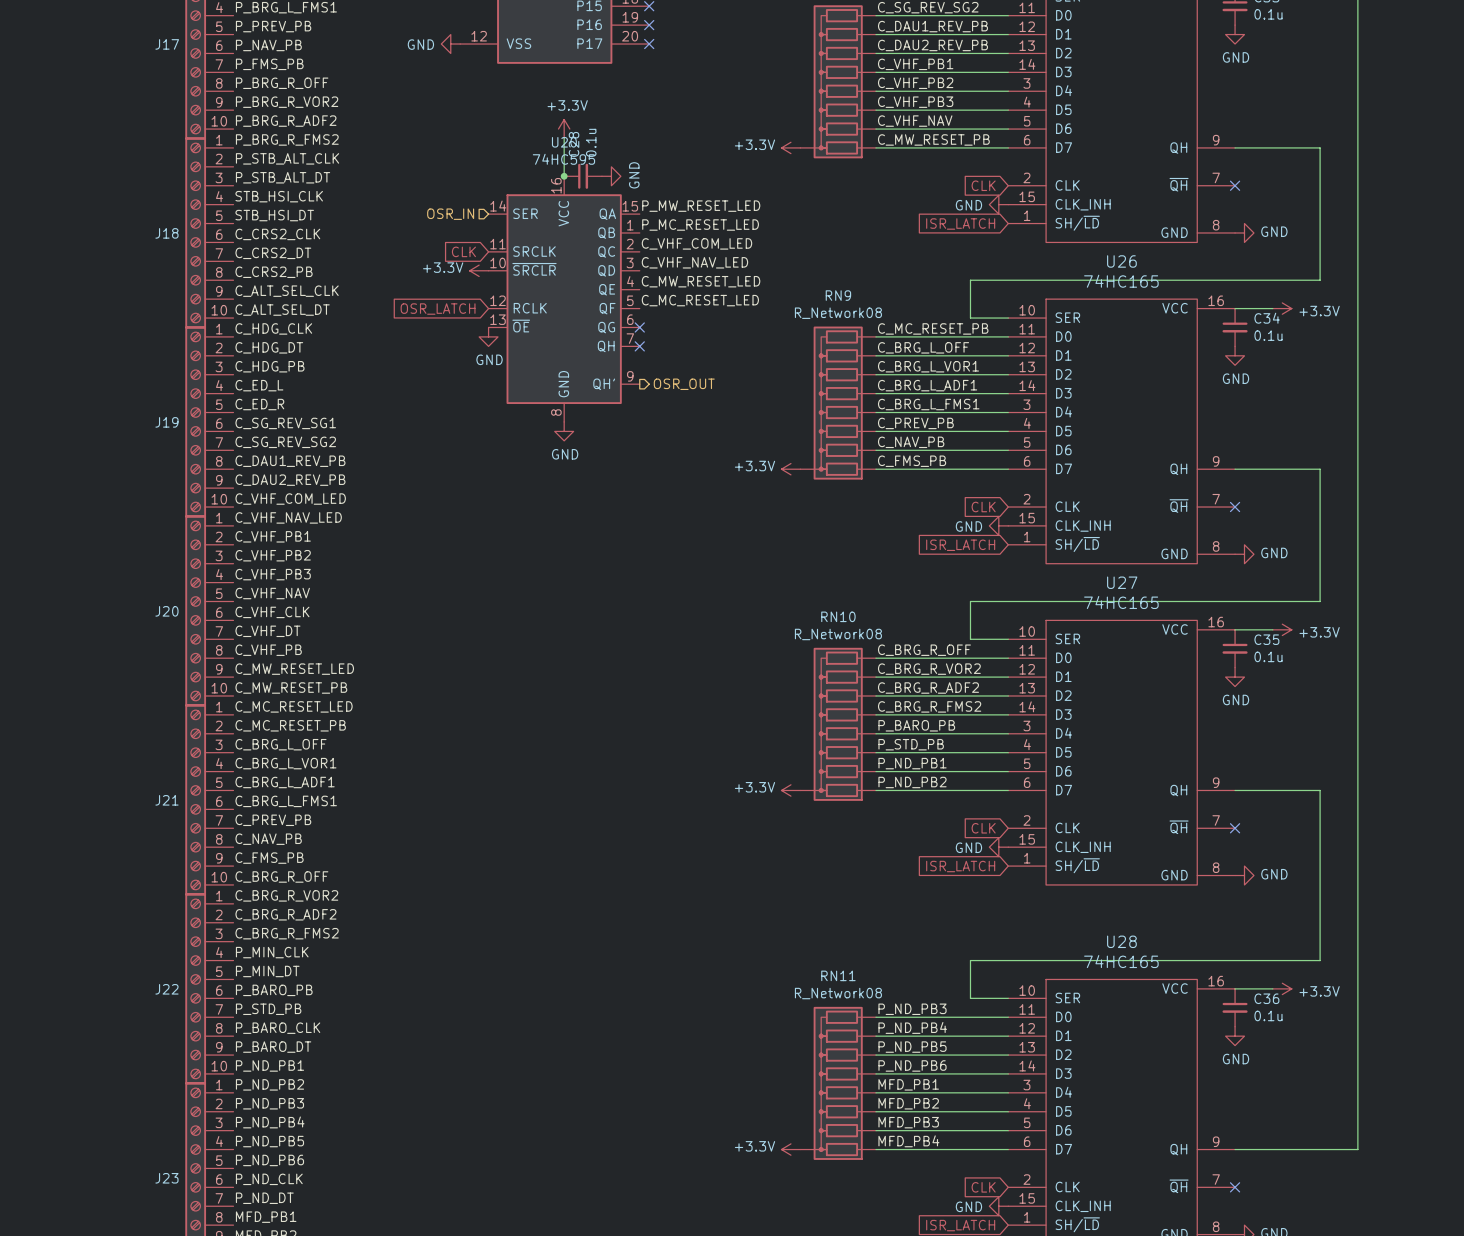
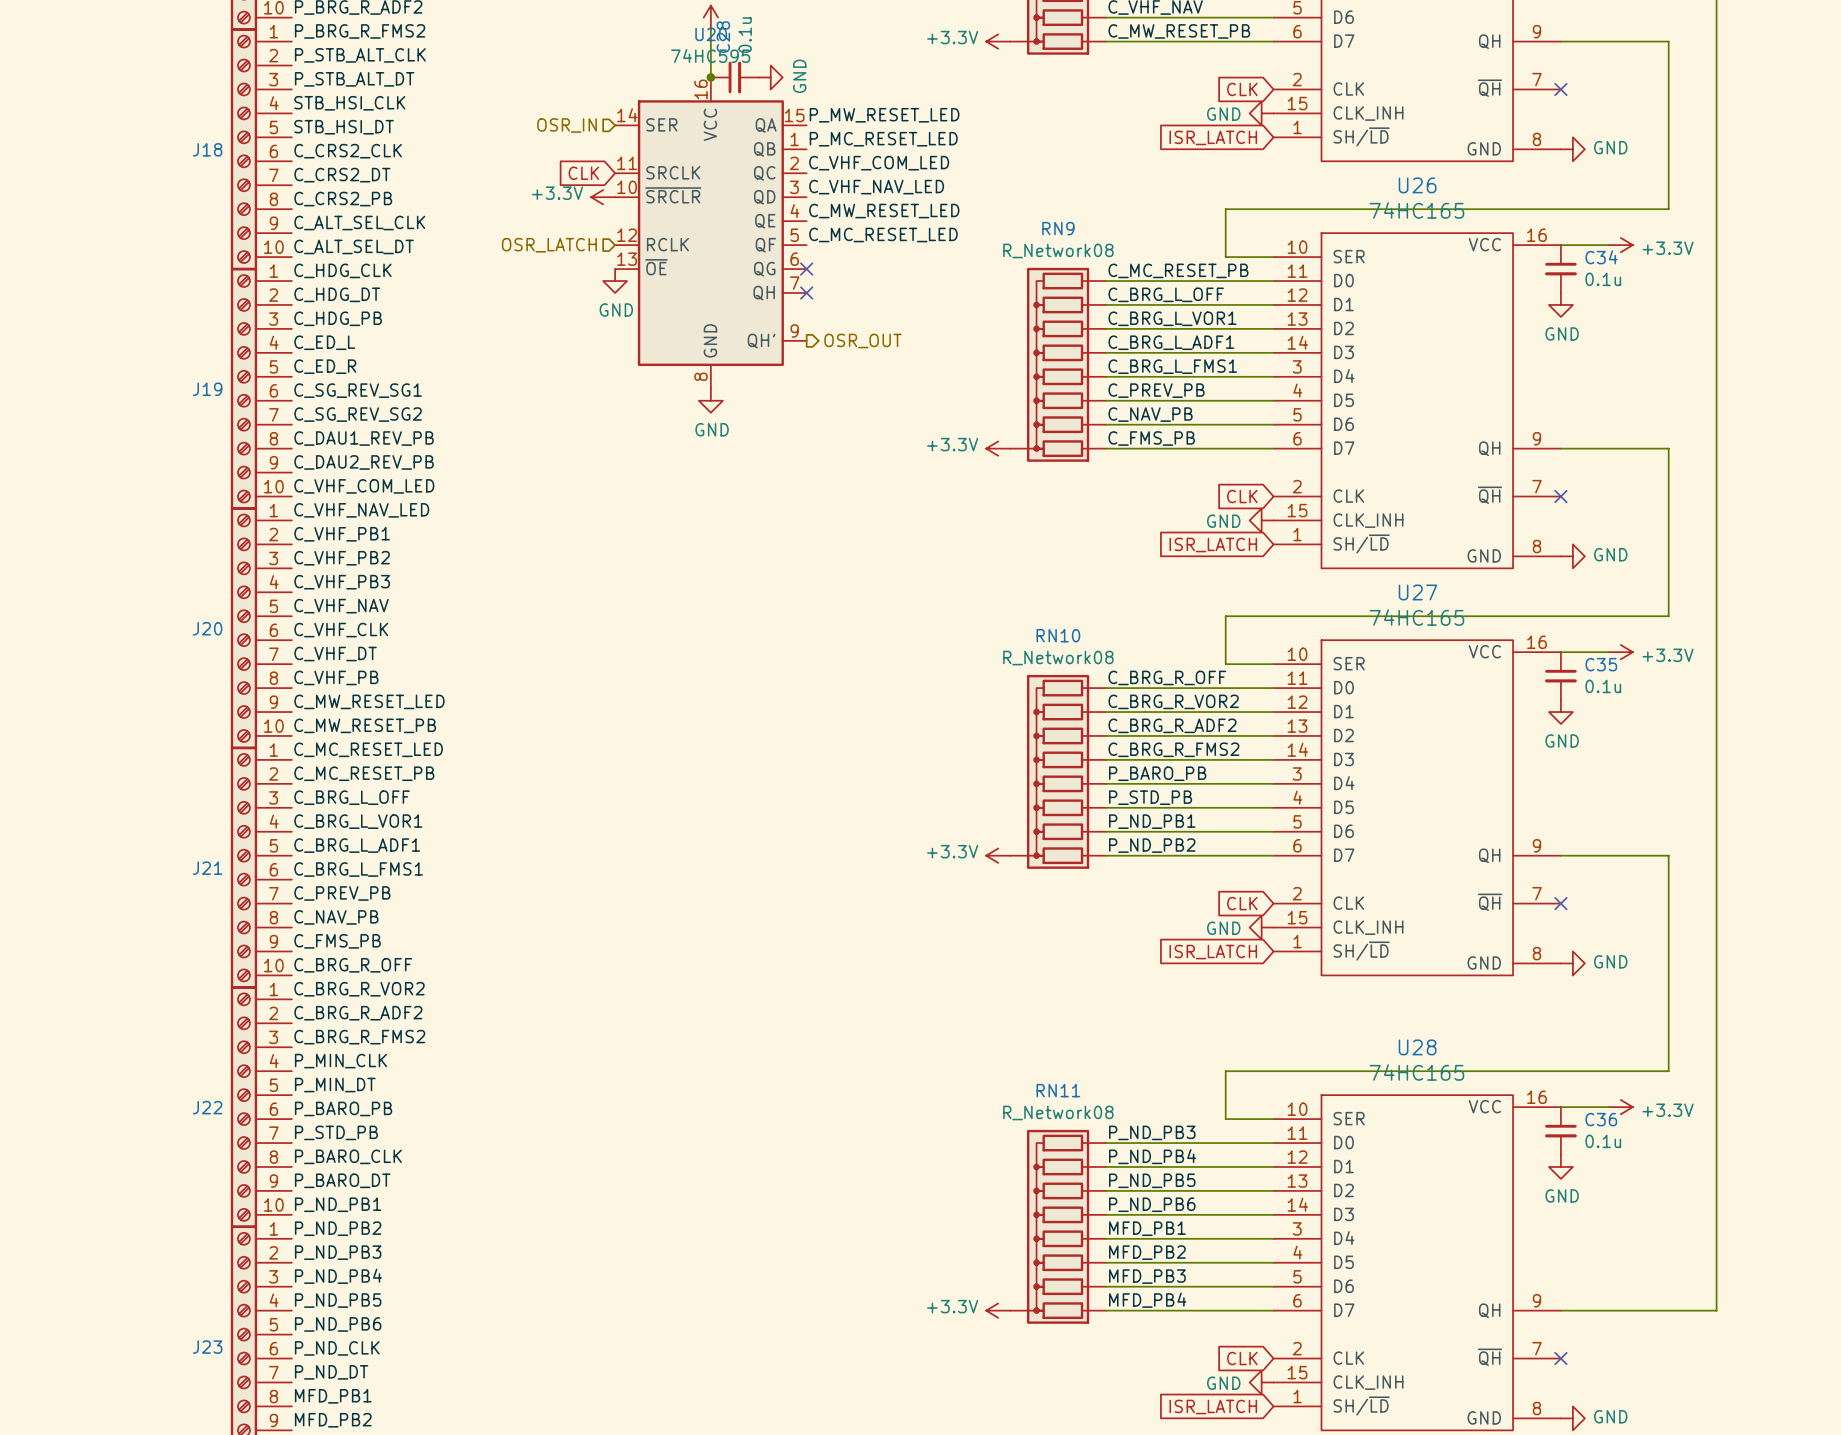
hierarchical label: none -> OSR_LATCH (549, 245)
global label: OSR_LATCH (438, 309) -> none

